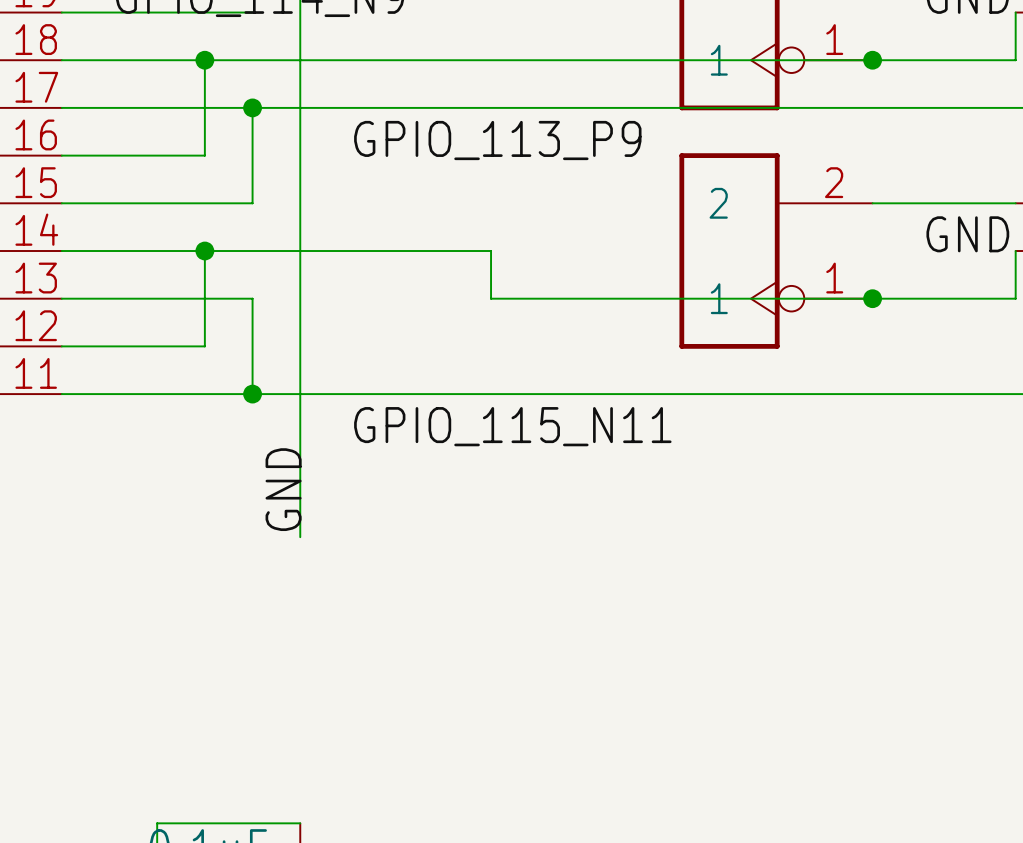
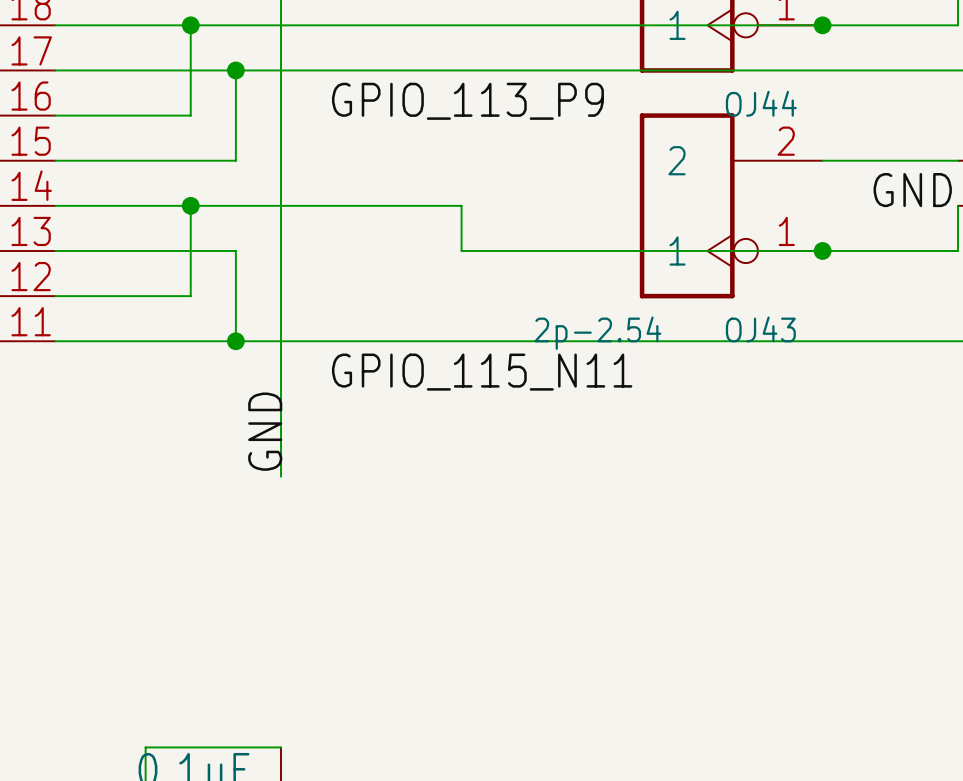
OJ44 name: none -> OJ44 (761, 103)
OJ43 name: none -> OJ43 (760, 329)
OJ43 value: none -> 2p-2.54 (597, 333)

